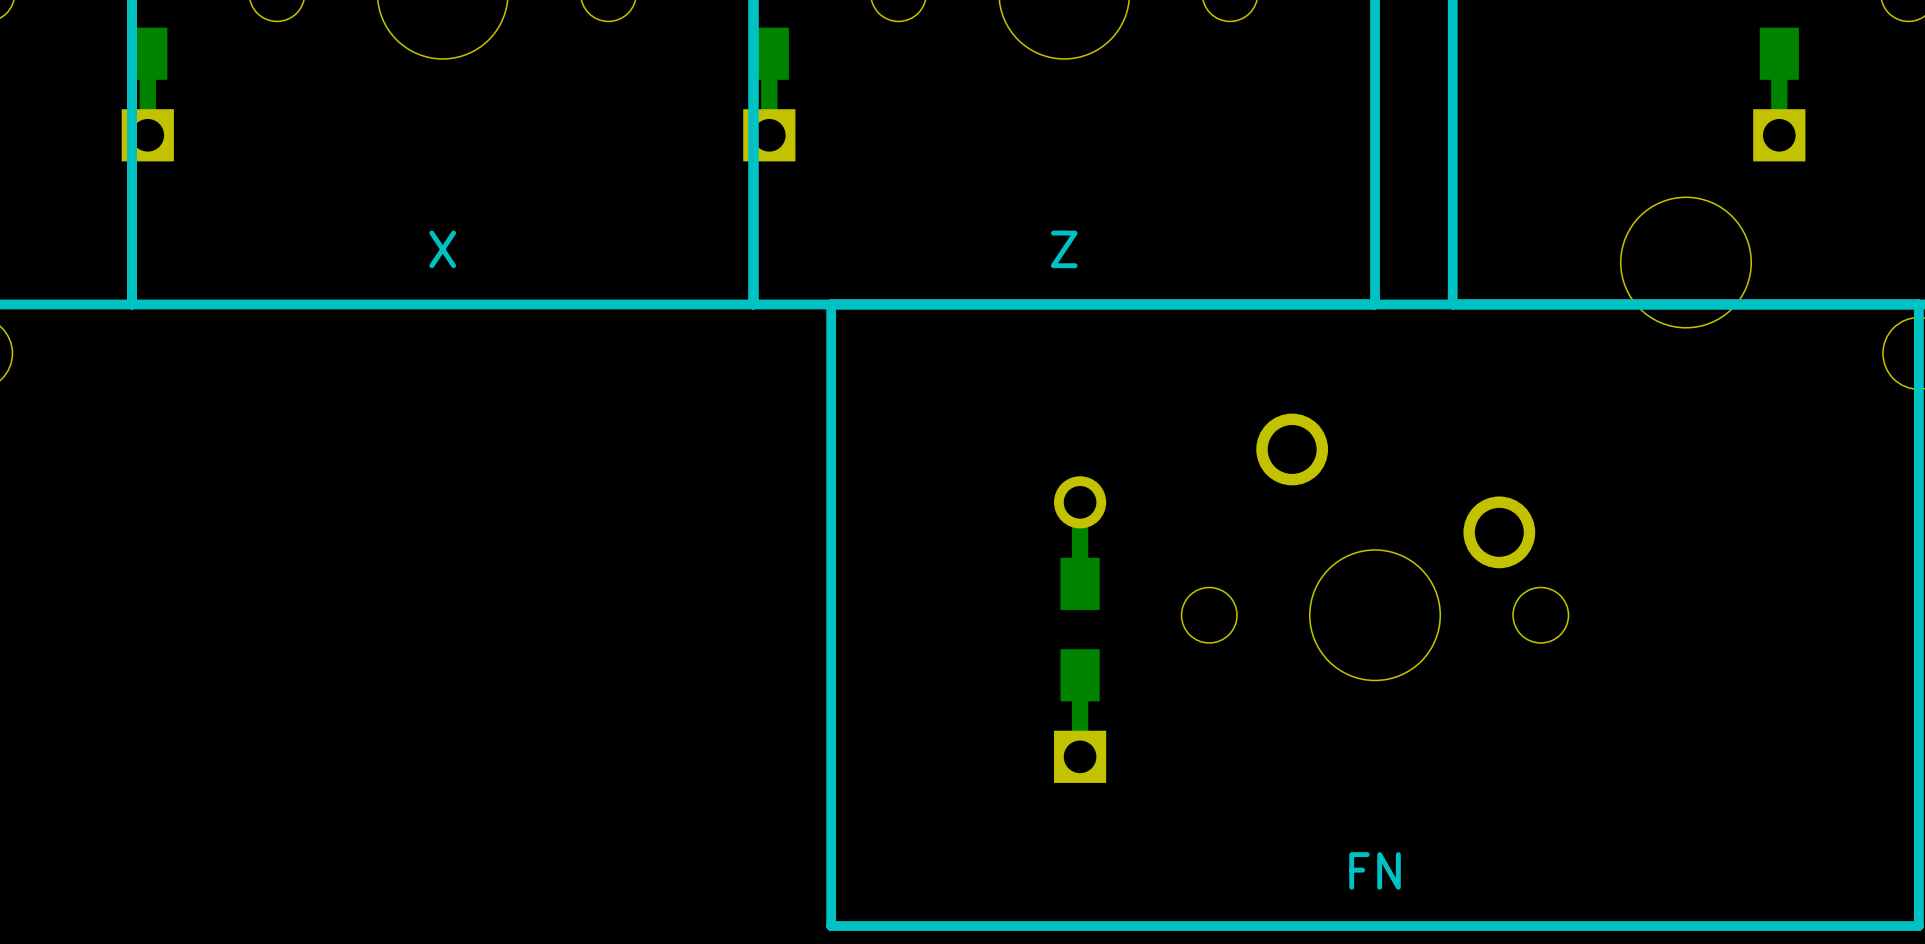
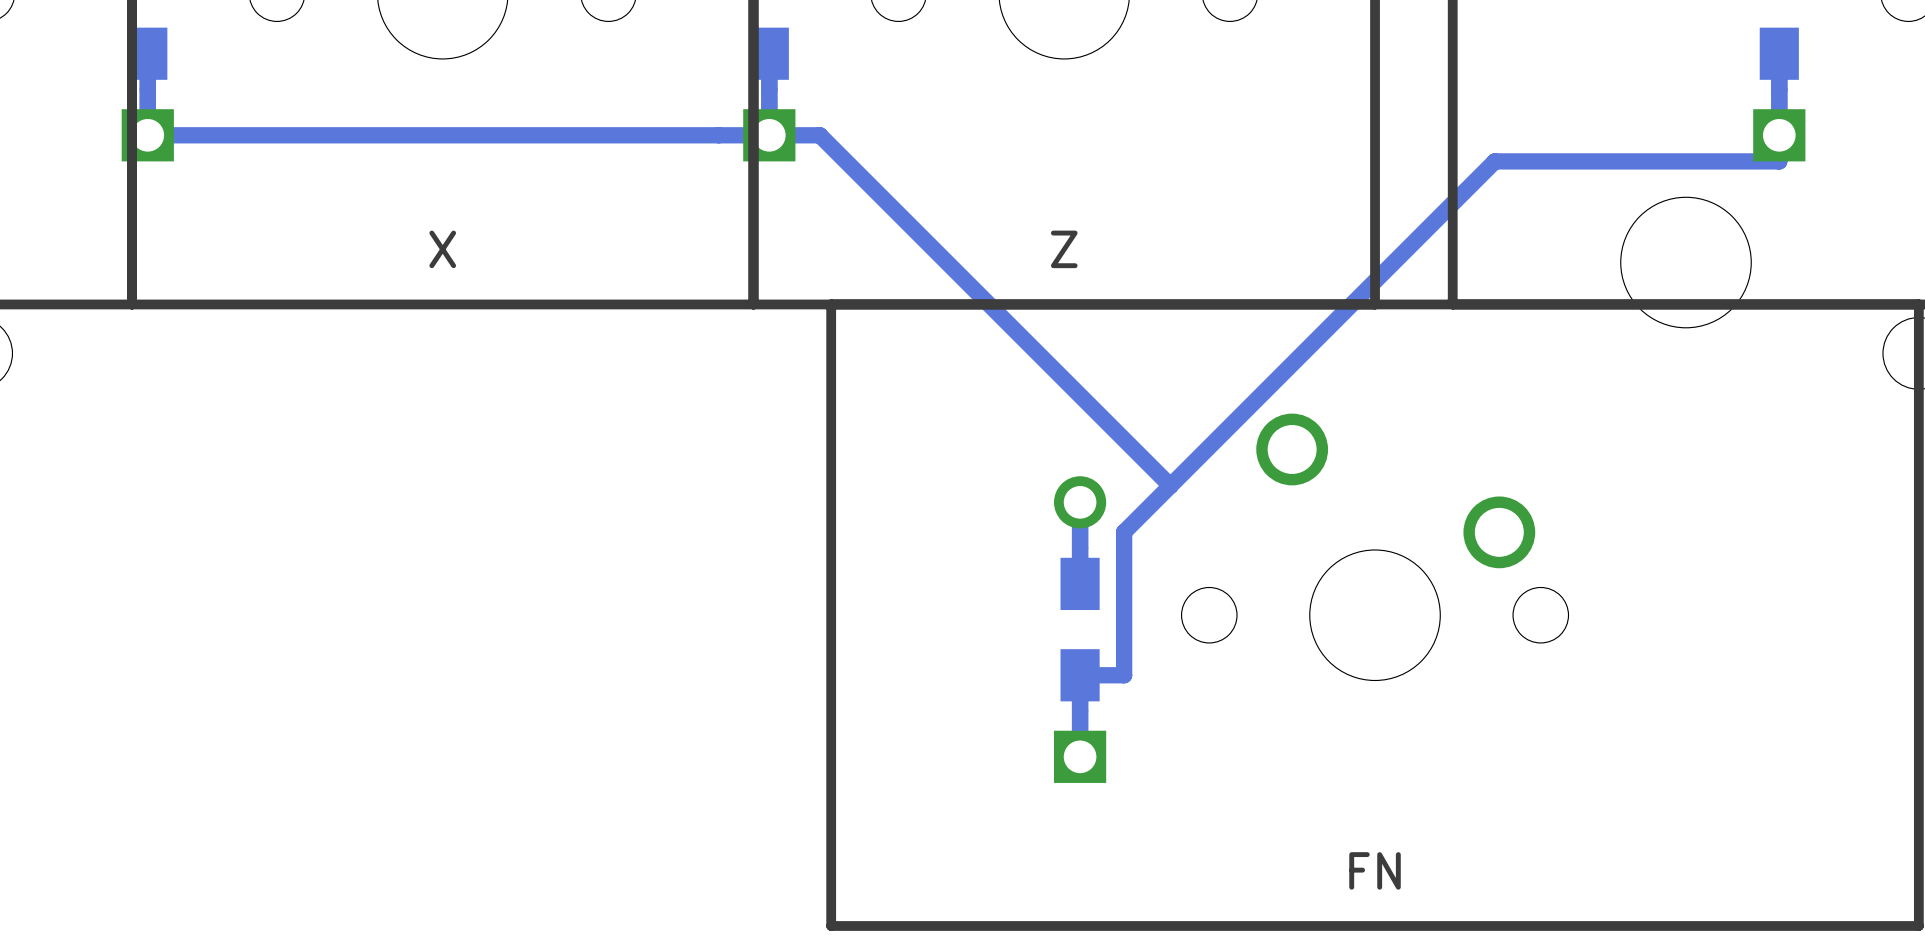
track: none -> (147, 53) (147, 135) (819, 135) (1170, 485)
track: none -> (1779, 53) (1779, 161) (1494, 161) (1124, 532) (1124, 675) (1080, 675) (1080, 756)

